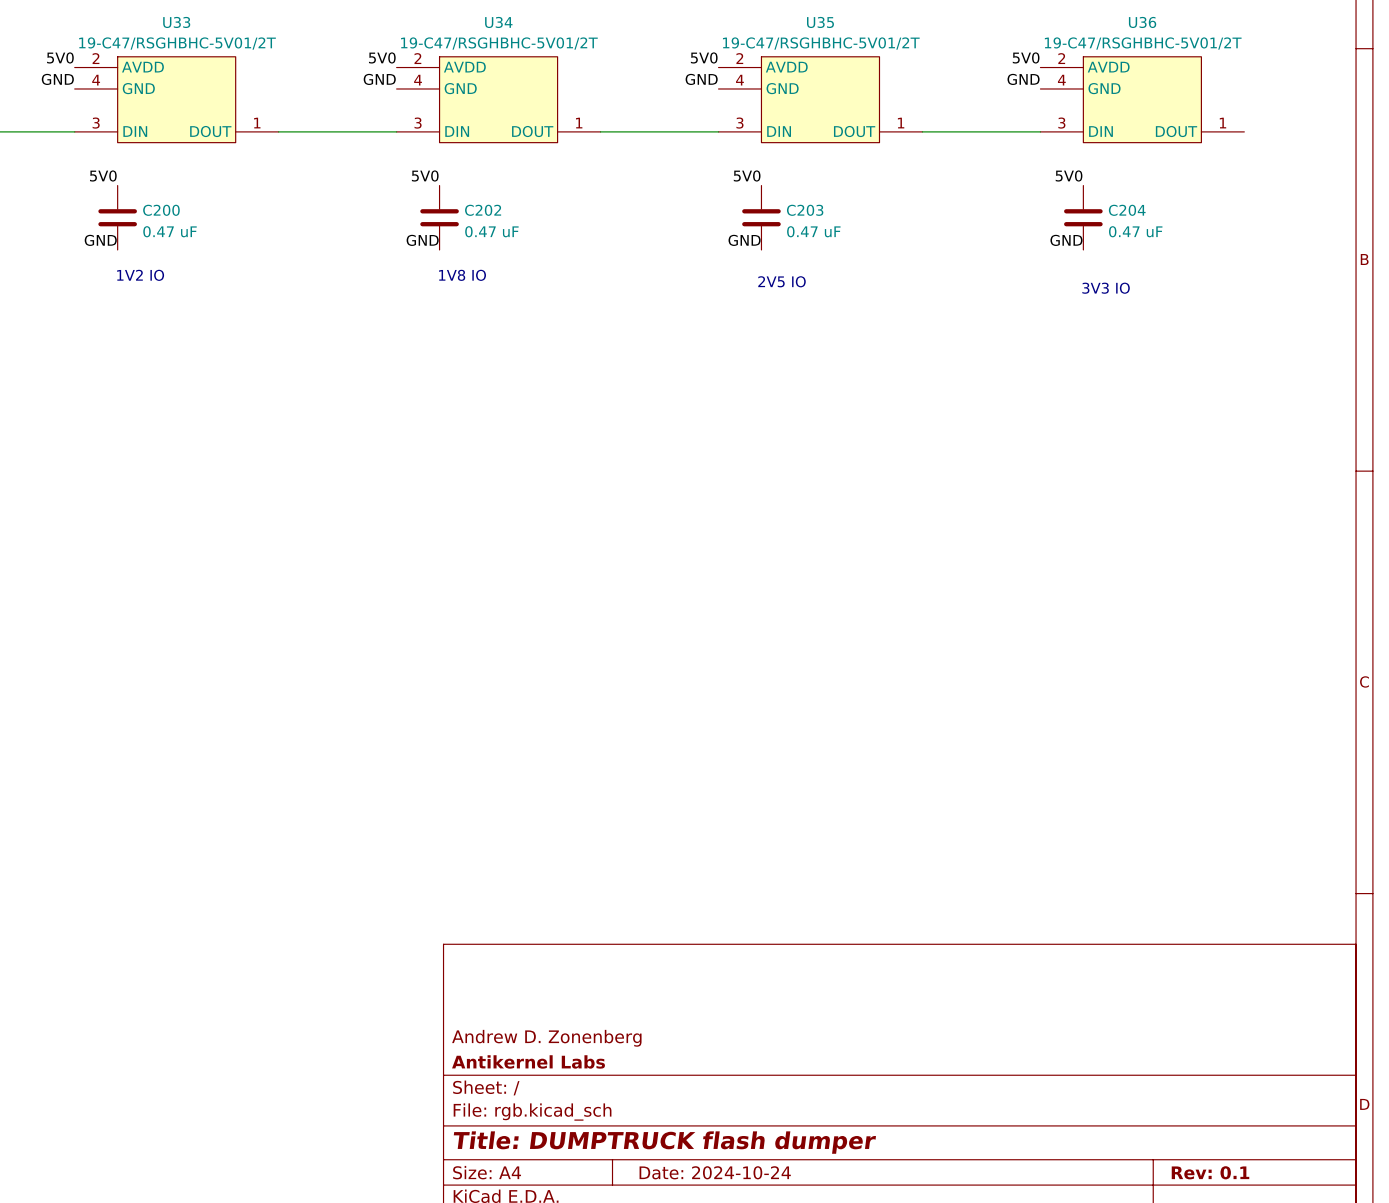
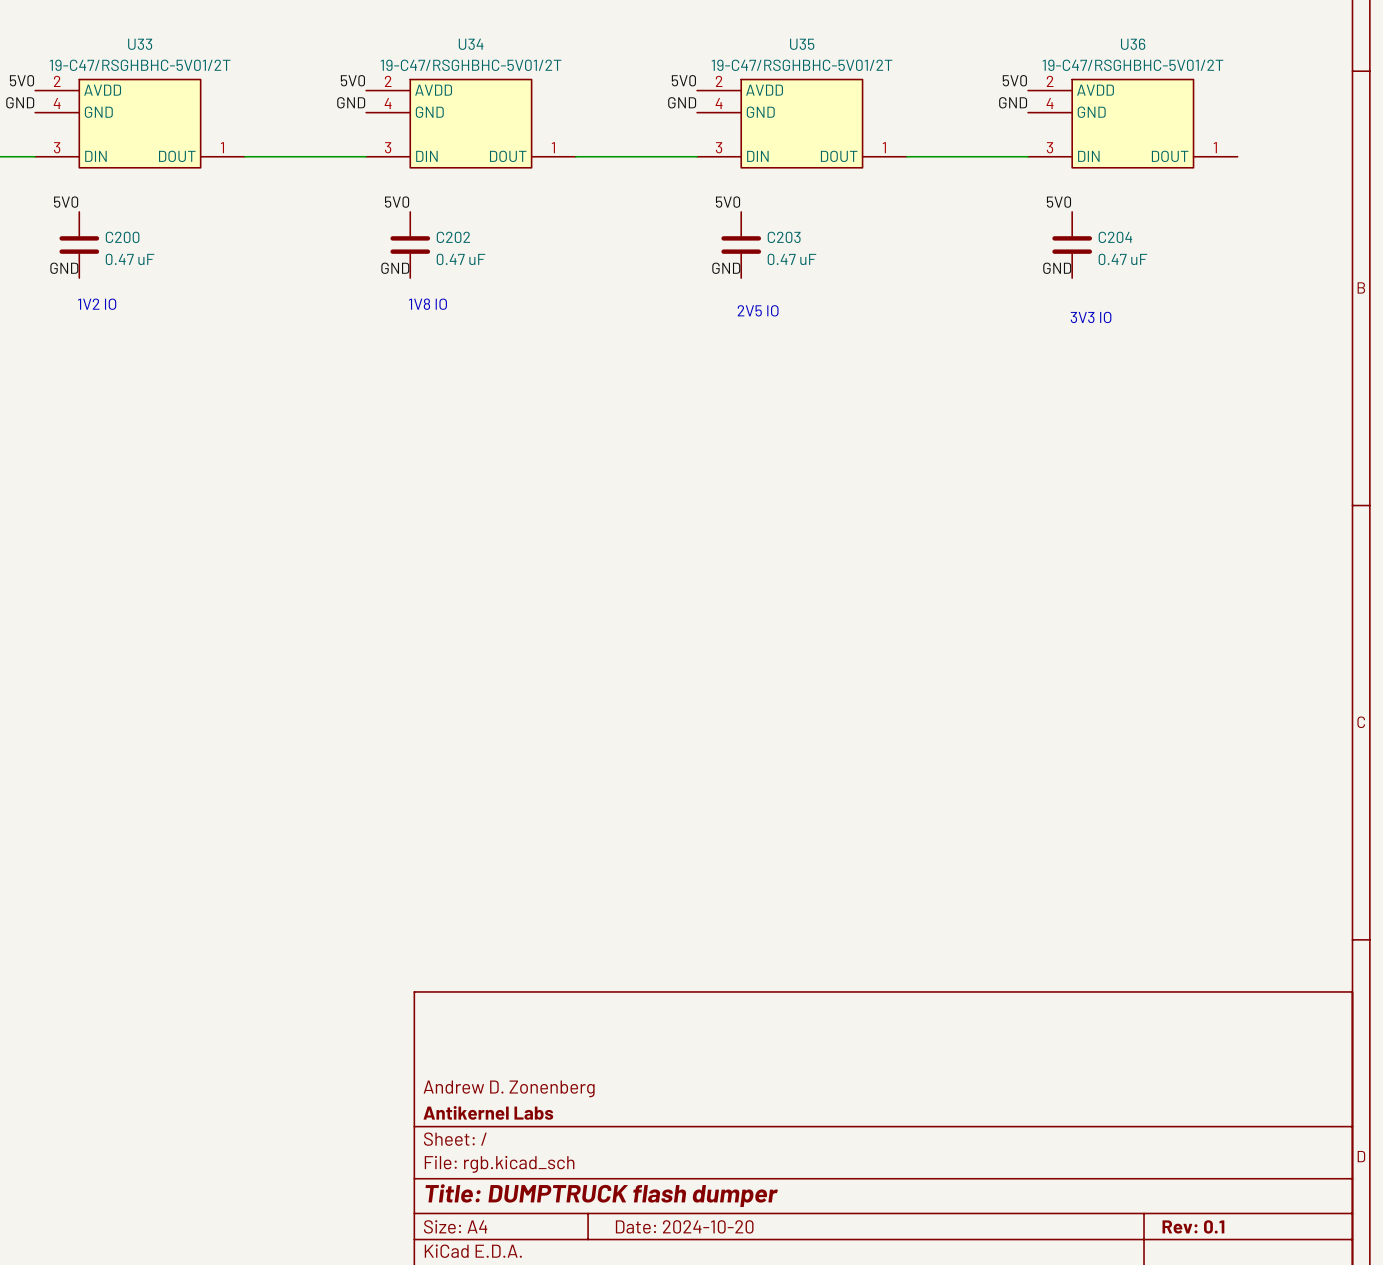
title block: Date: 2024-10-24 (715, 1172) -> Date: 2024-10-20 (684, 1226)

